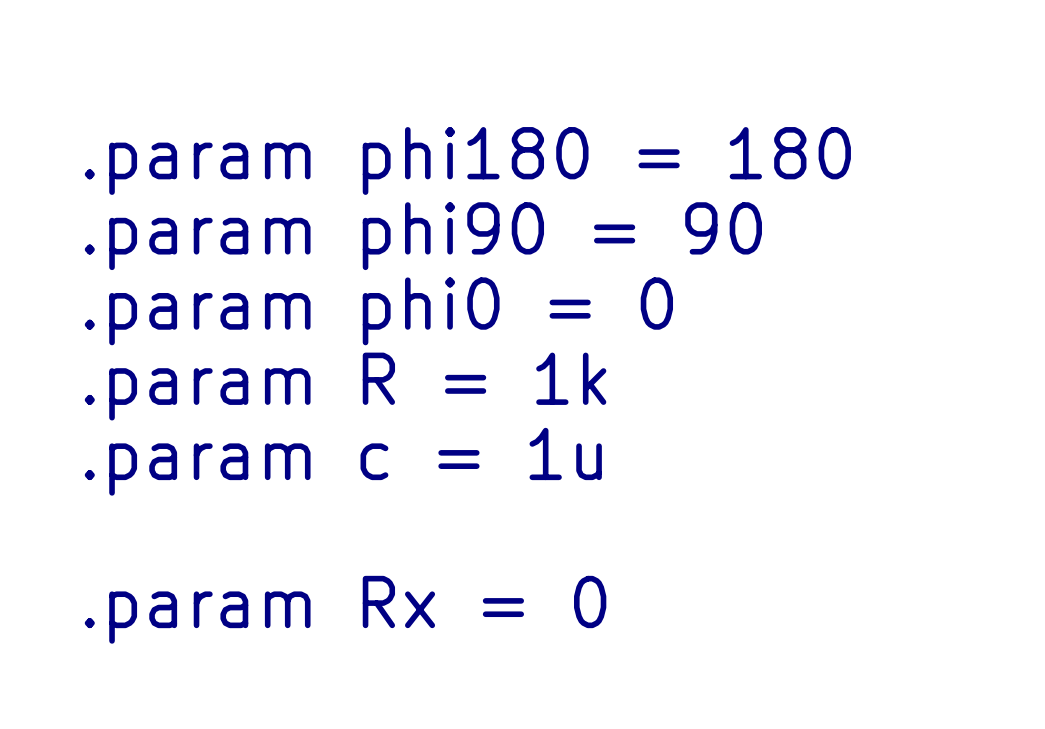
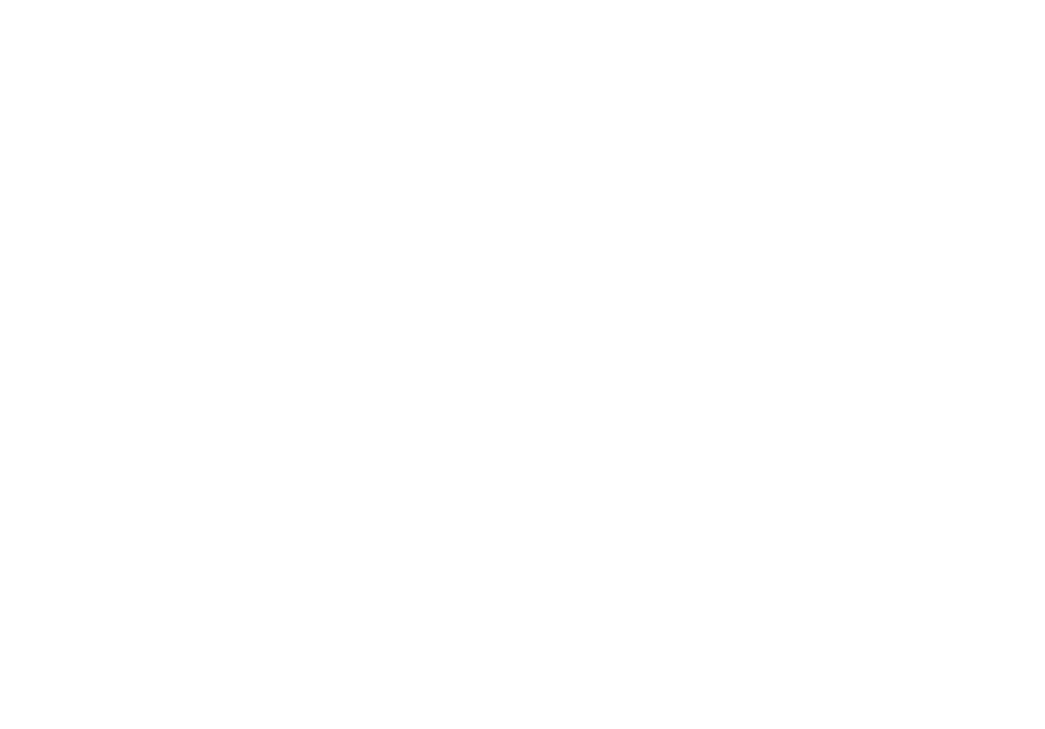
text: .param phi180 = 180 (467, 160) -> none
text: .param phi90 = 90 (423, 236) -> none
text: .param phi0 = 0 (378, 311) -> none
text: .param R = 1k (345, 386) -> none
text: .param c = 1u (343, 461) -> none
text: .param Rx = 0 (345, 609) -> none

